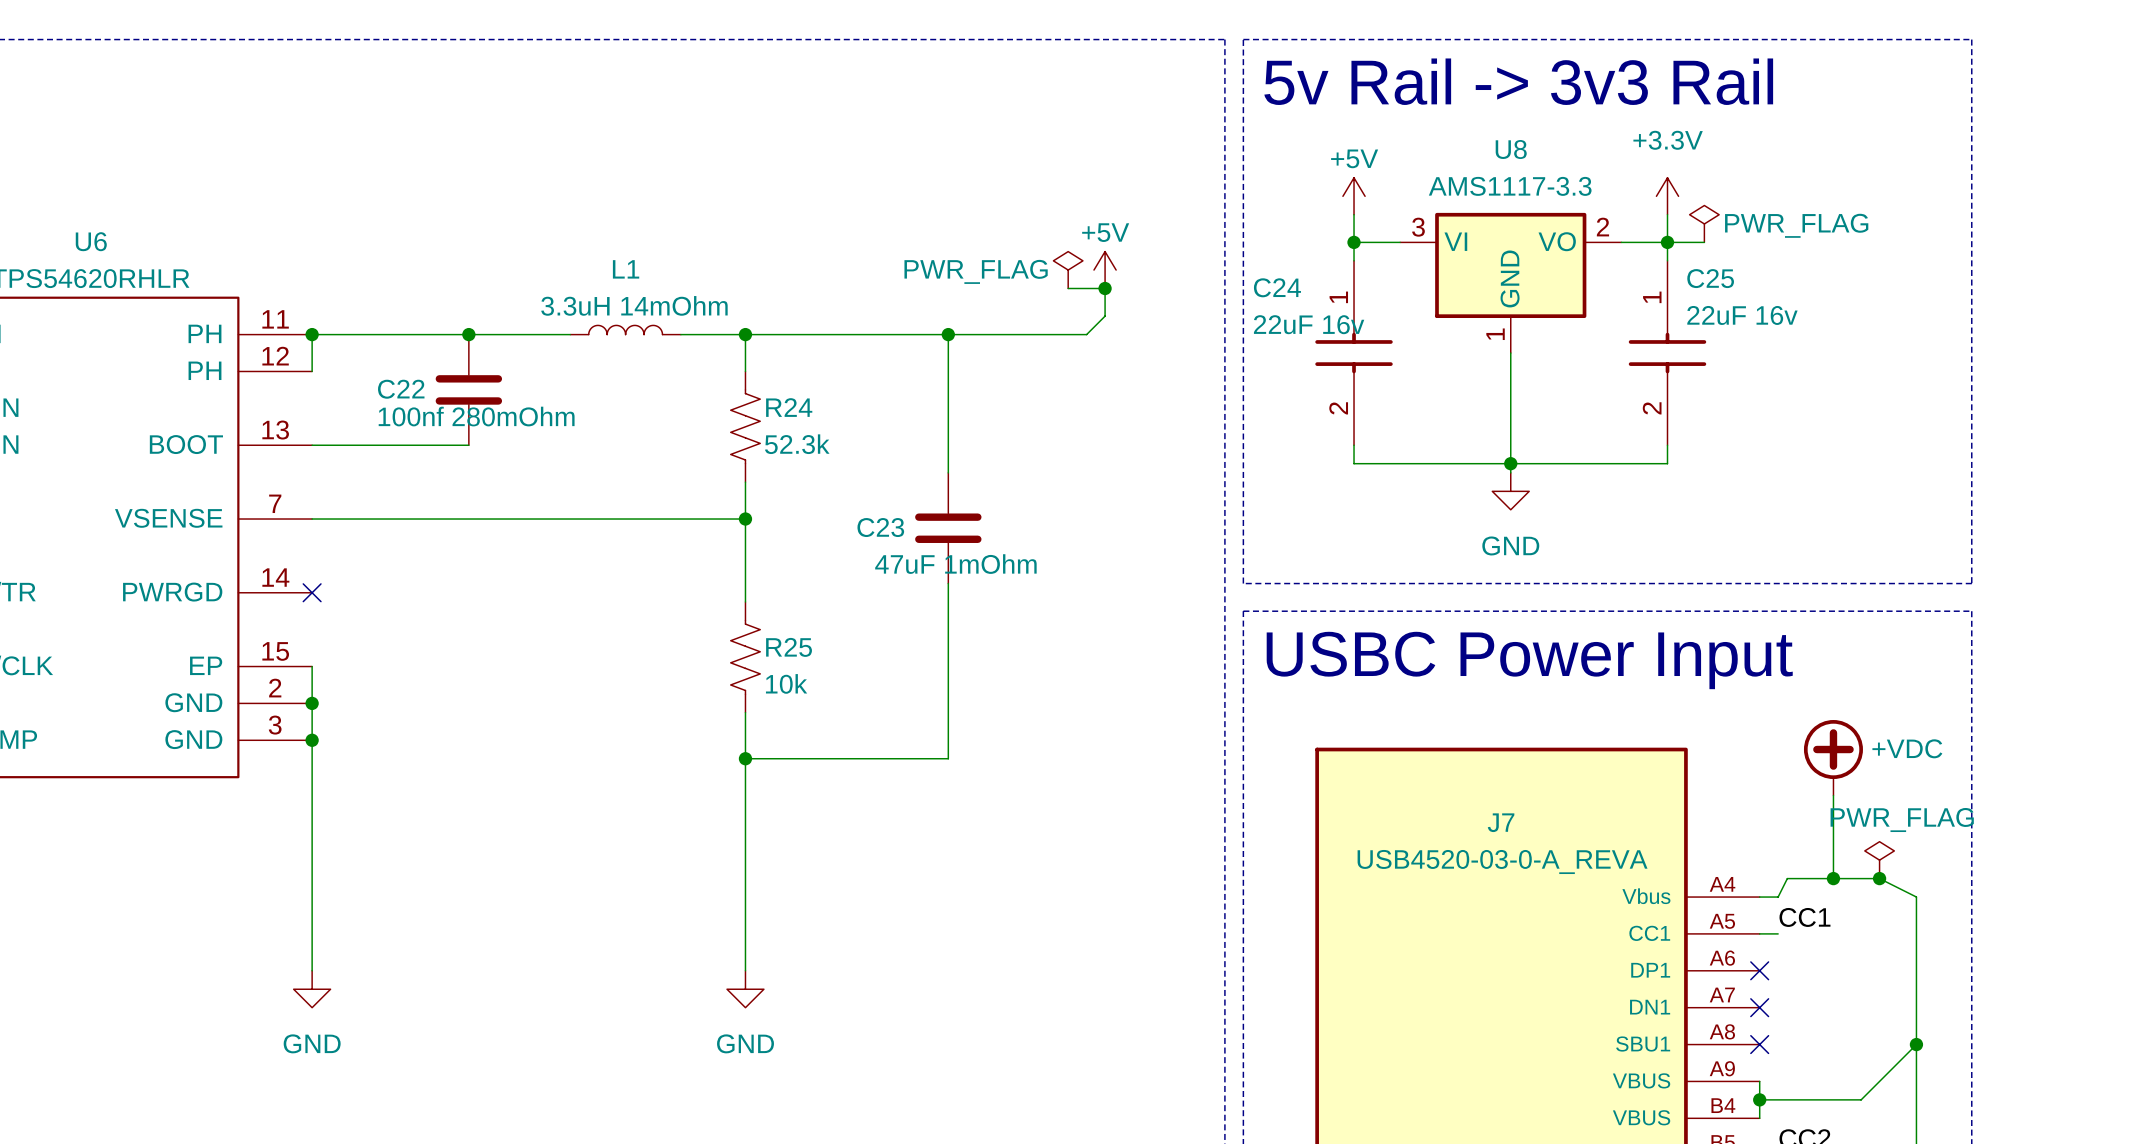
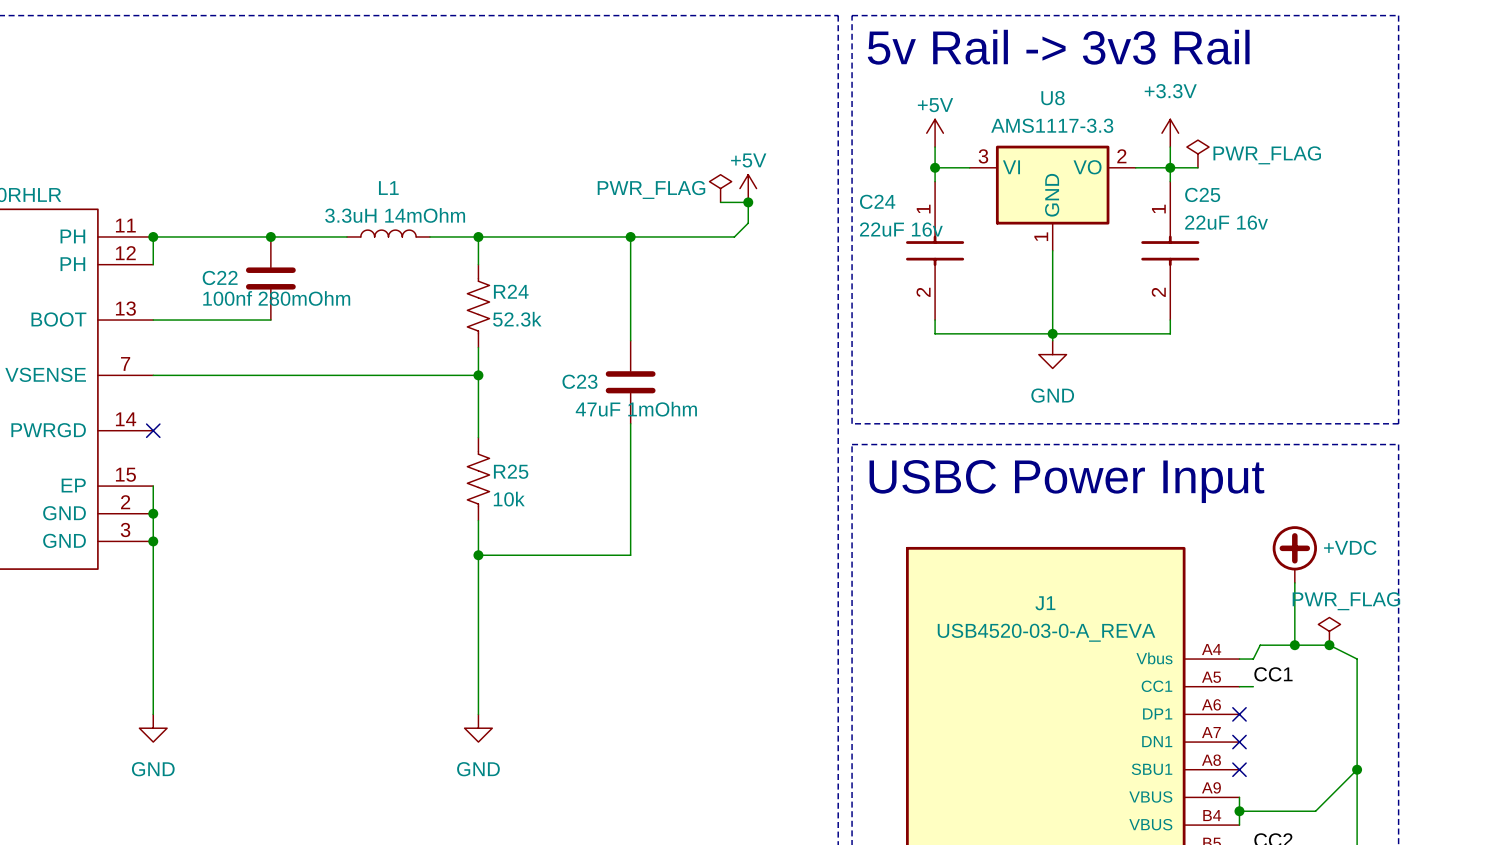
J7 name: J7 (1501, 822) -> J1 (1045, 603)

